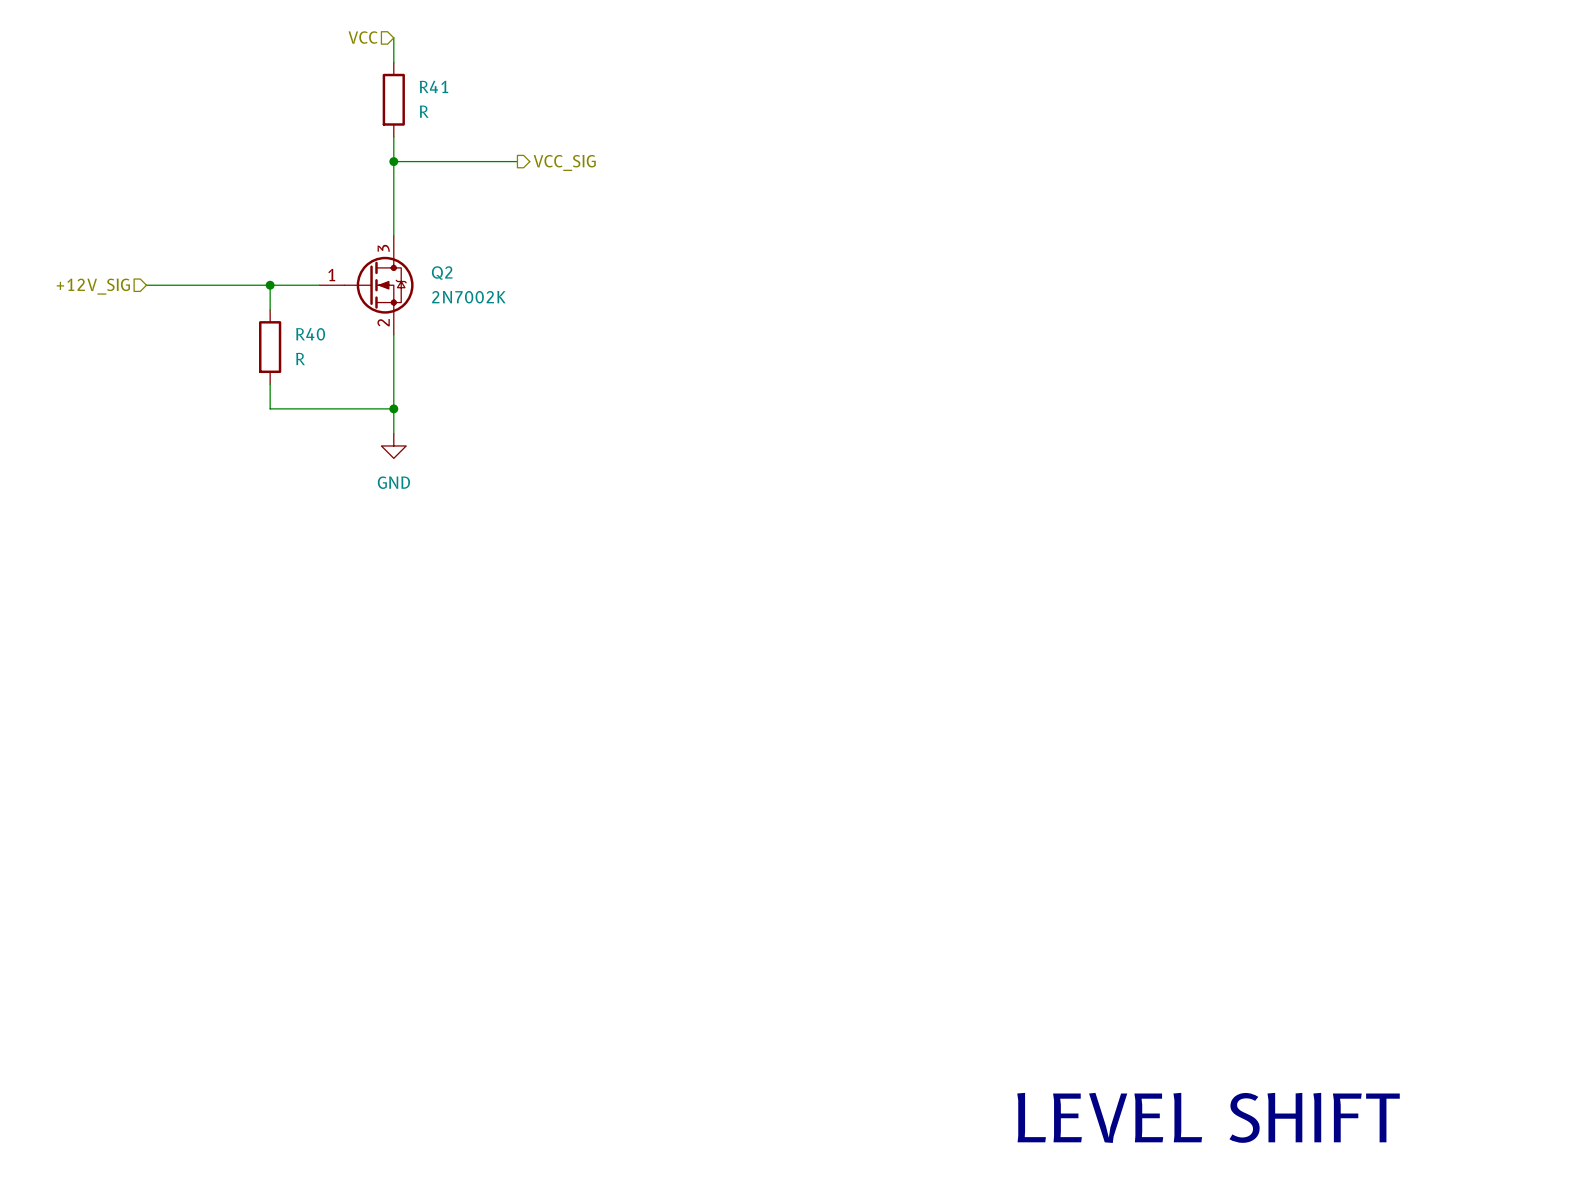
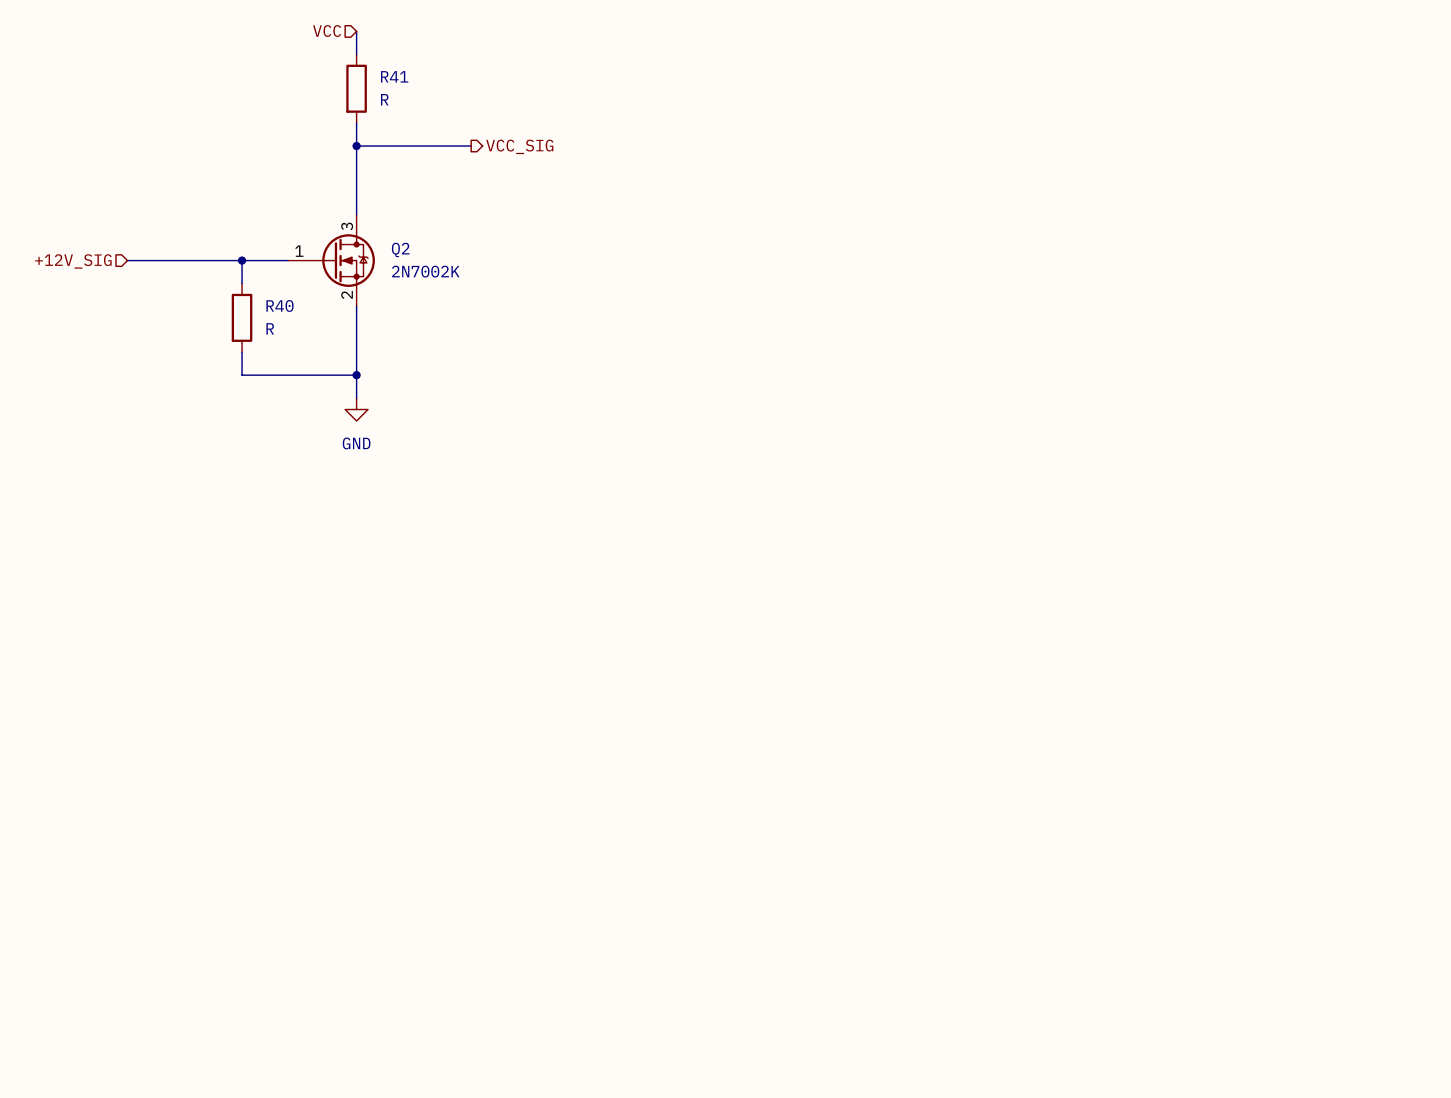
text: LEVEL SHIFT (1208, 1117) -> none

